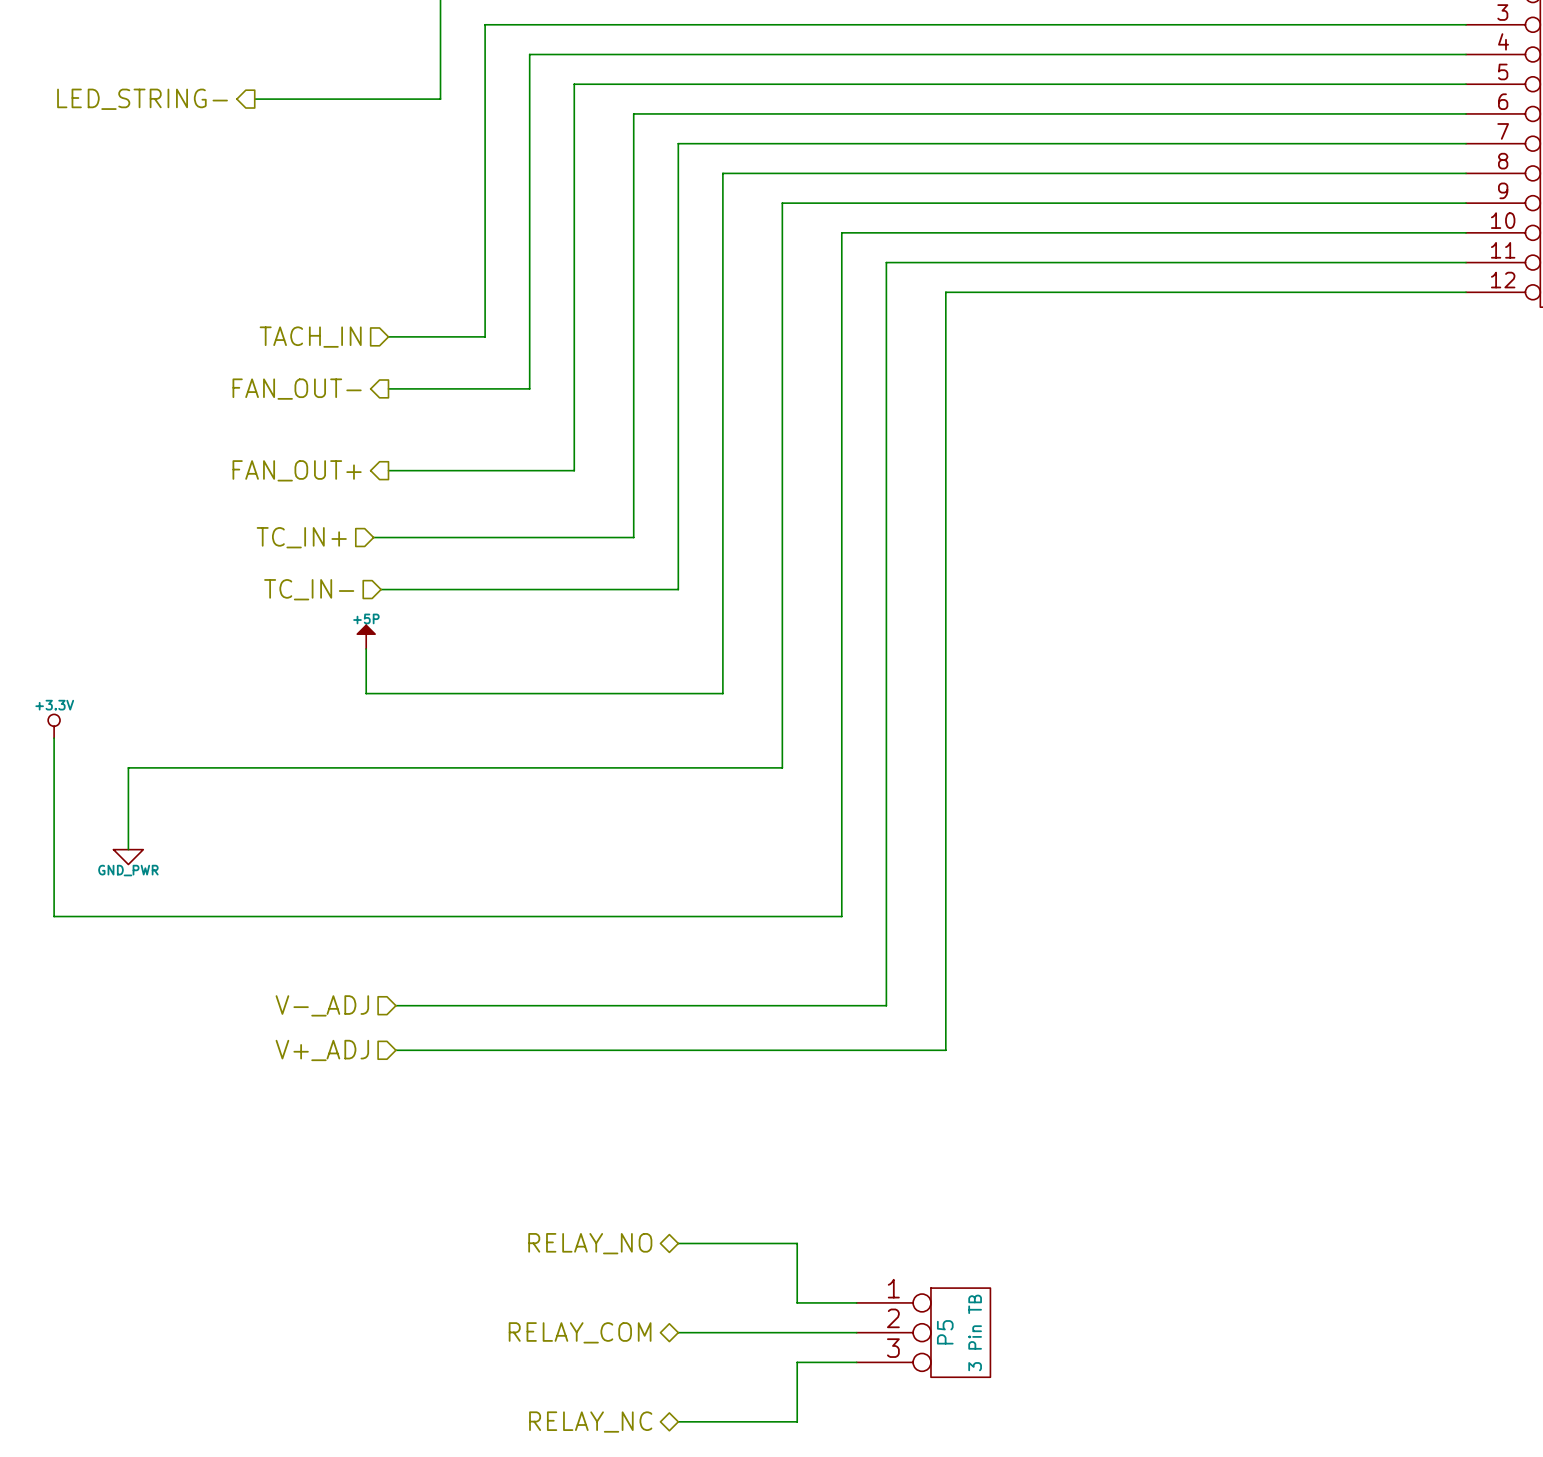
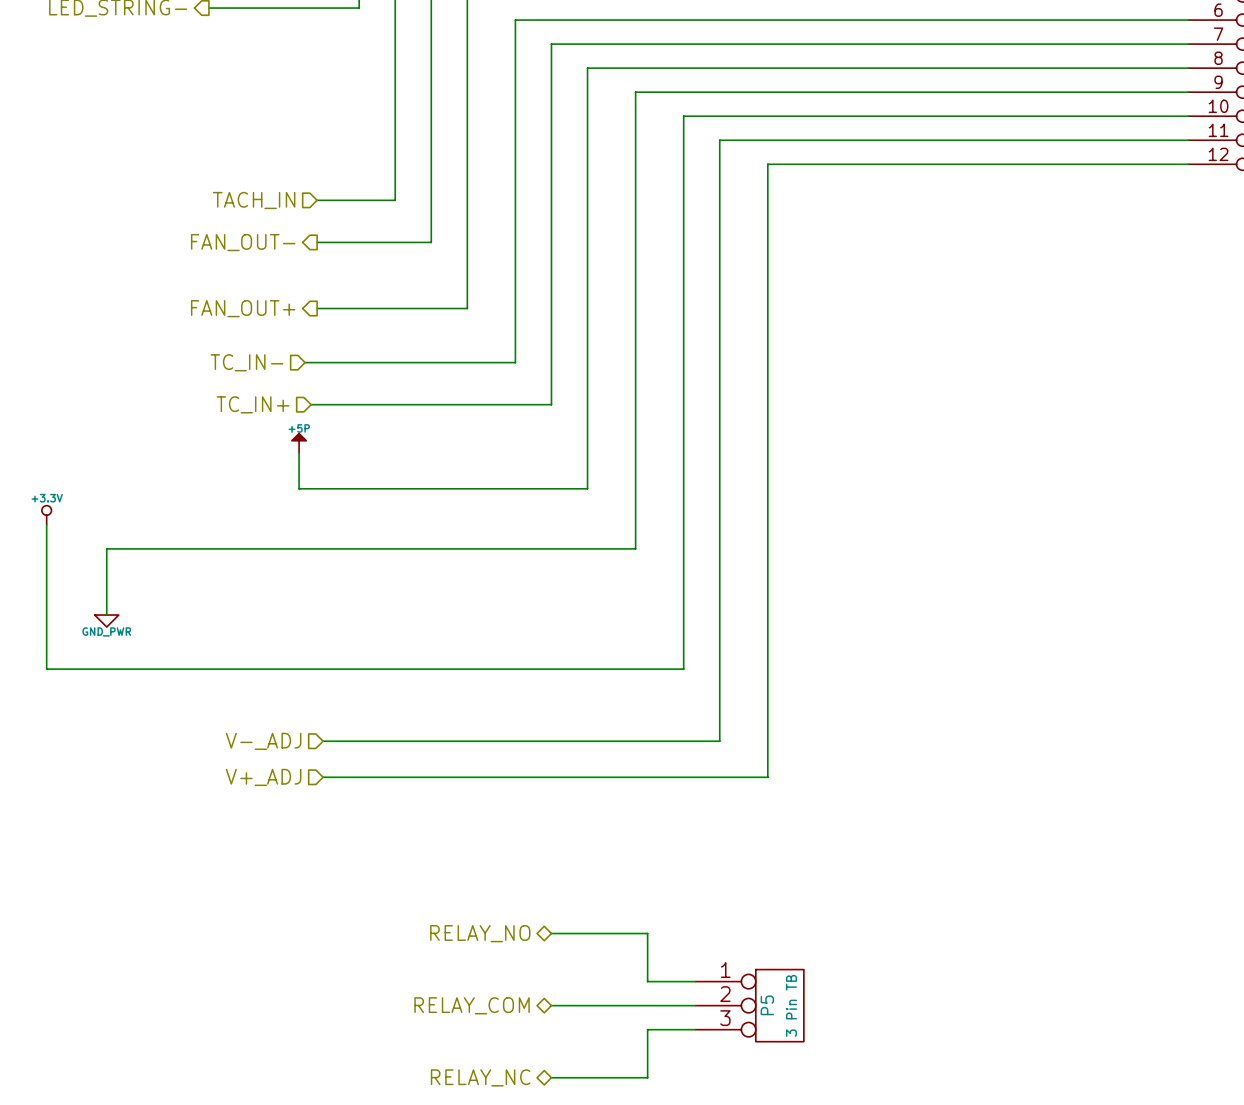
hierarchical label: TC_IN+ (301, 537) -> TC_IN- (246, 362)
hierarchical label: TC_IN- (309, 589) -> TC_IN+ (252, 404)

